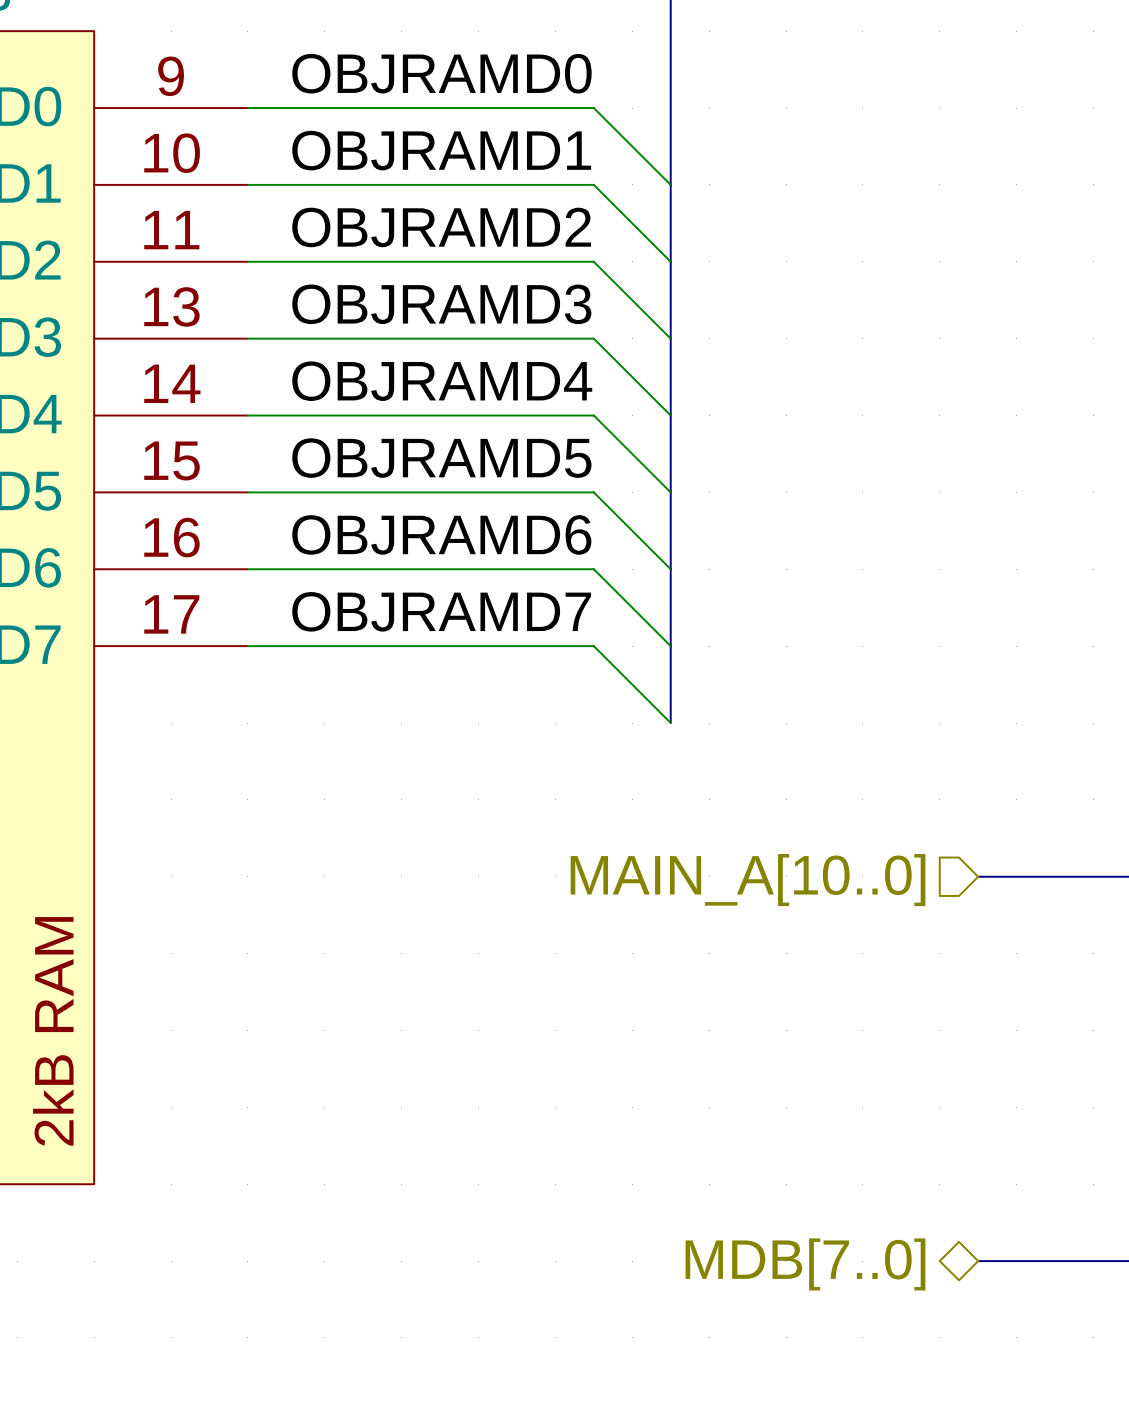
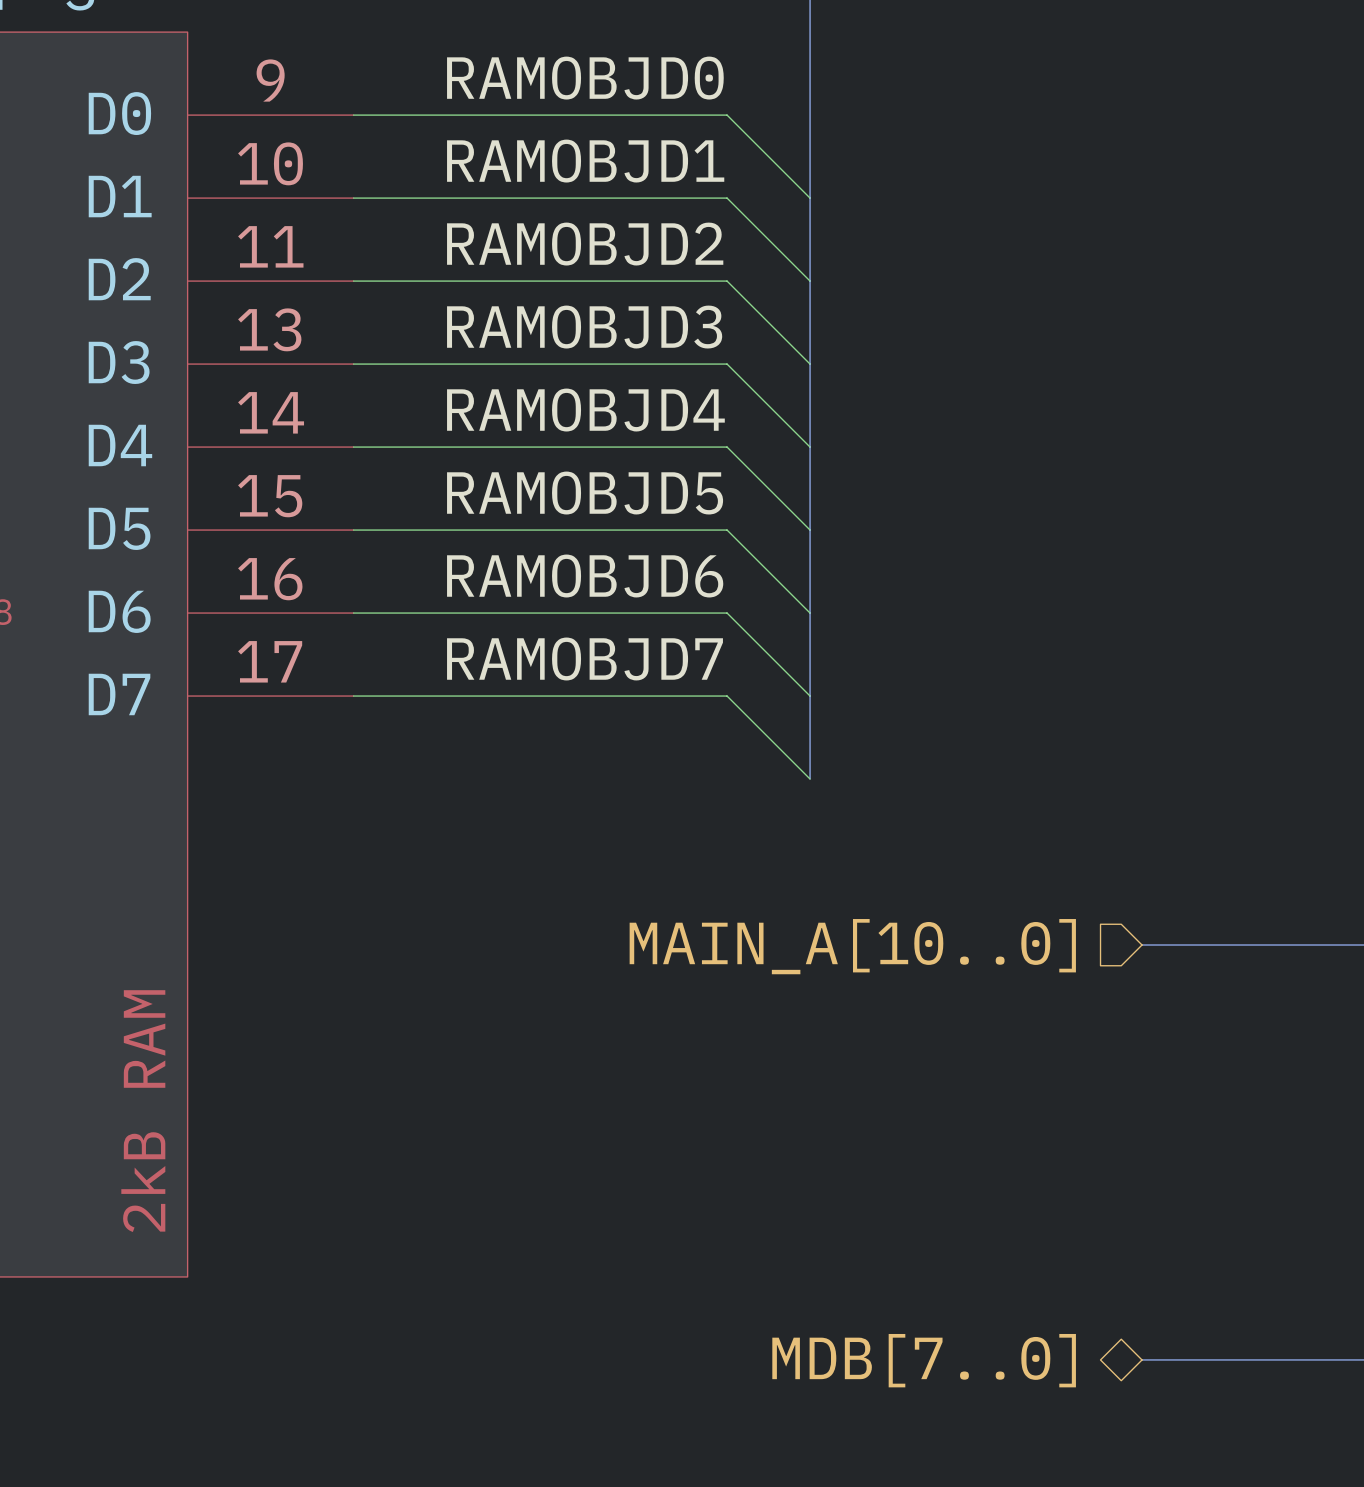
label: OBJRAMD0 (441, 73) -> RAMOBJD0 (585, 78)
label: OBJRAMD1 (441, 150) -> RAMOBJD1 (585, 161)
label: OBJRAMD2 (441, 227) -> RAMOBJD2 (585, 244)
label: OBJRAMD3 (441, 304) -> RAMOBJD3 (584, 327)
label: OBJRAMD4 (442, 381) -> RAMOBJD4 (585, 410)
label: OBJRAMD5 (441, 458) -> RAMOBJD5 (585, 493)
label: OBJRAMD6 (441, 534) -> RAMOBJD6 (585, 576)
label: OBJRAMD7 (441, 611) -> RAMOBJD7 (585, 659)

